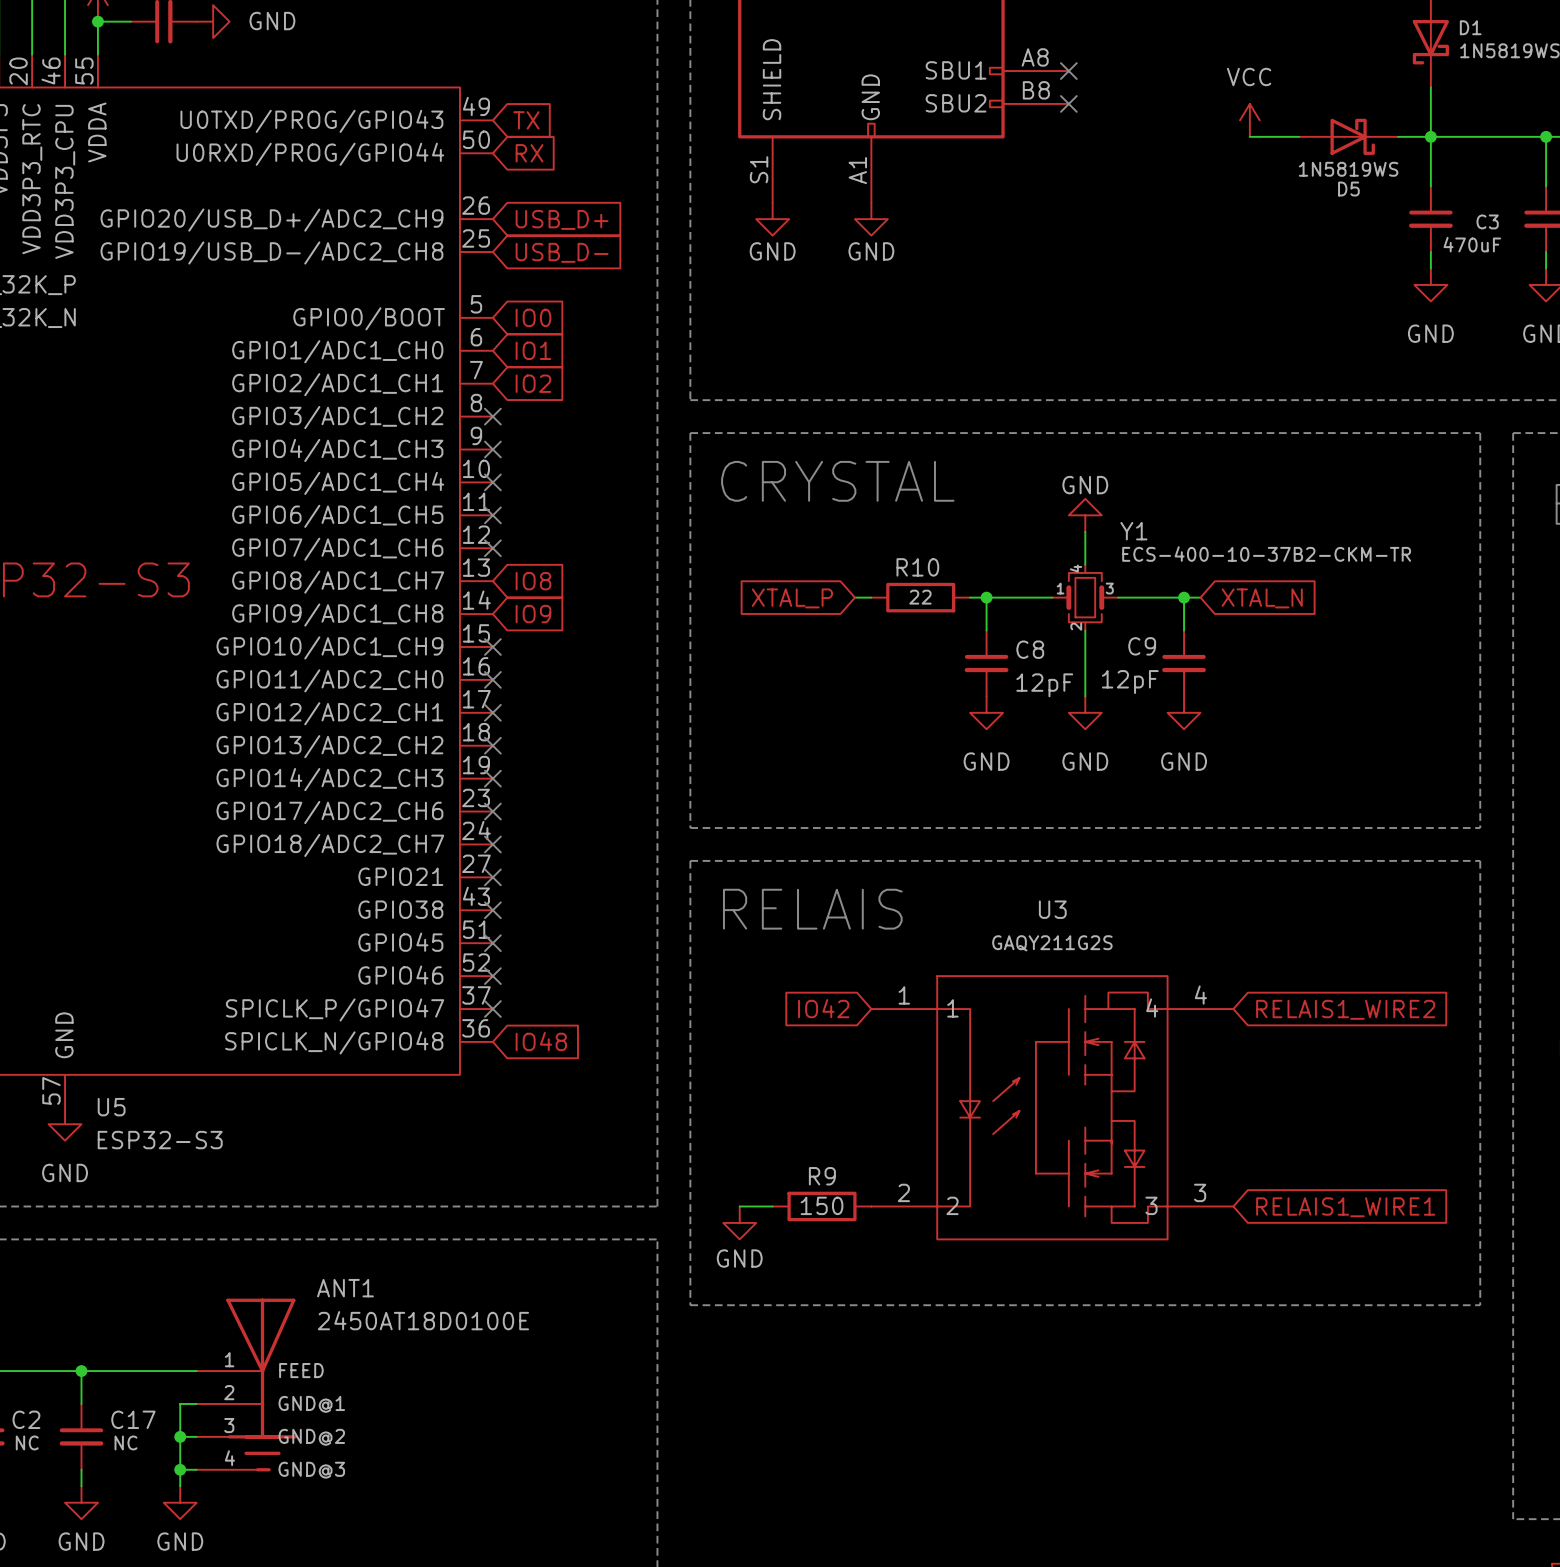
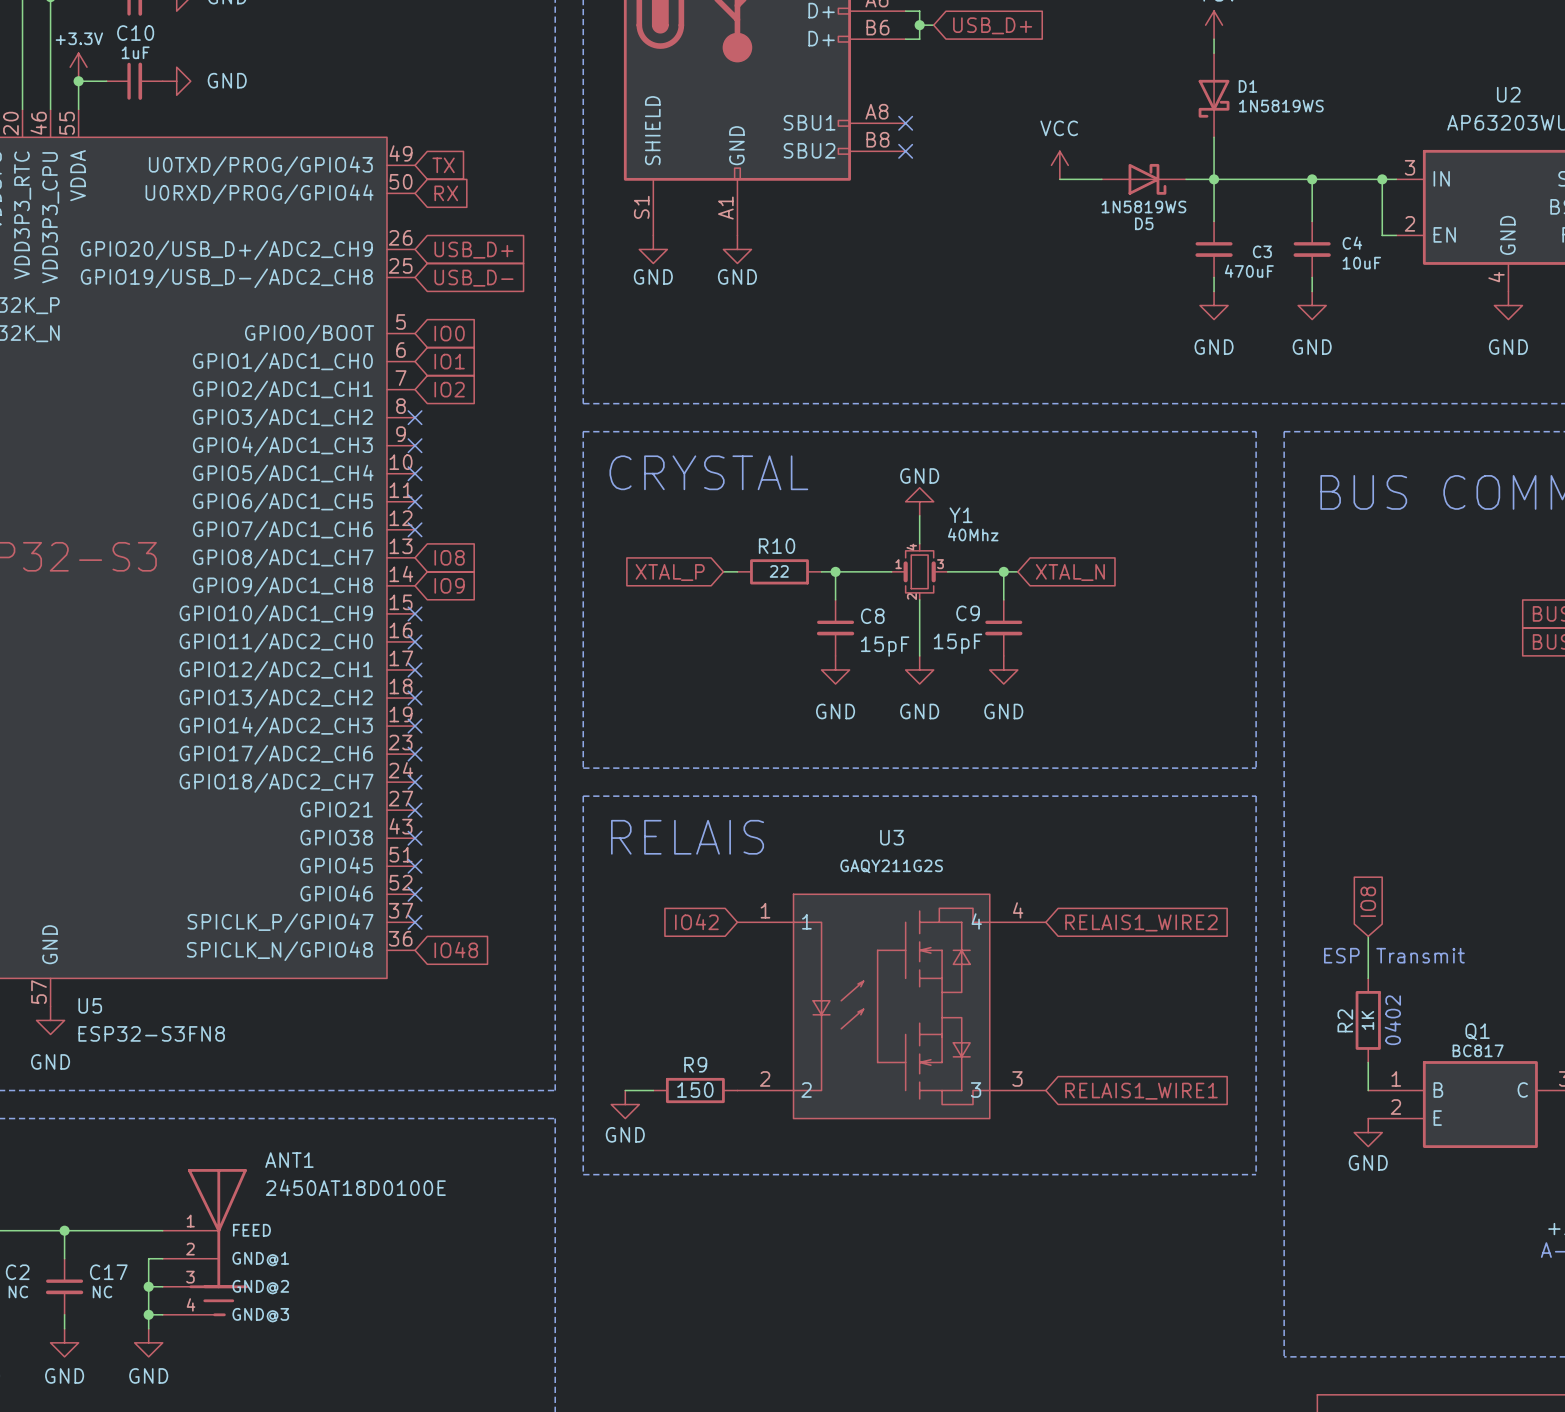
Y1 value: ECS-400-10-37B2-CKM-TR (1266, 554) -> 40Mhz (973, 534)
C9 value: 12pF (1130, 682) -> 15pF (958, 643)
C8 value: 12pF (1044, 685) -> 15pF (885, 646)
U5 value: ESP32-S3 (160, 1140) -> ESP32-S3FN8 (151, 1033)

